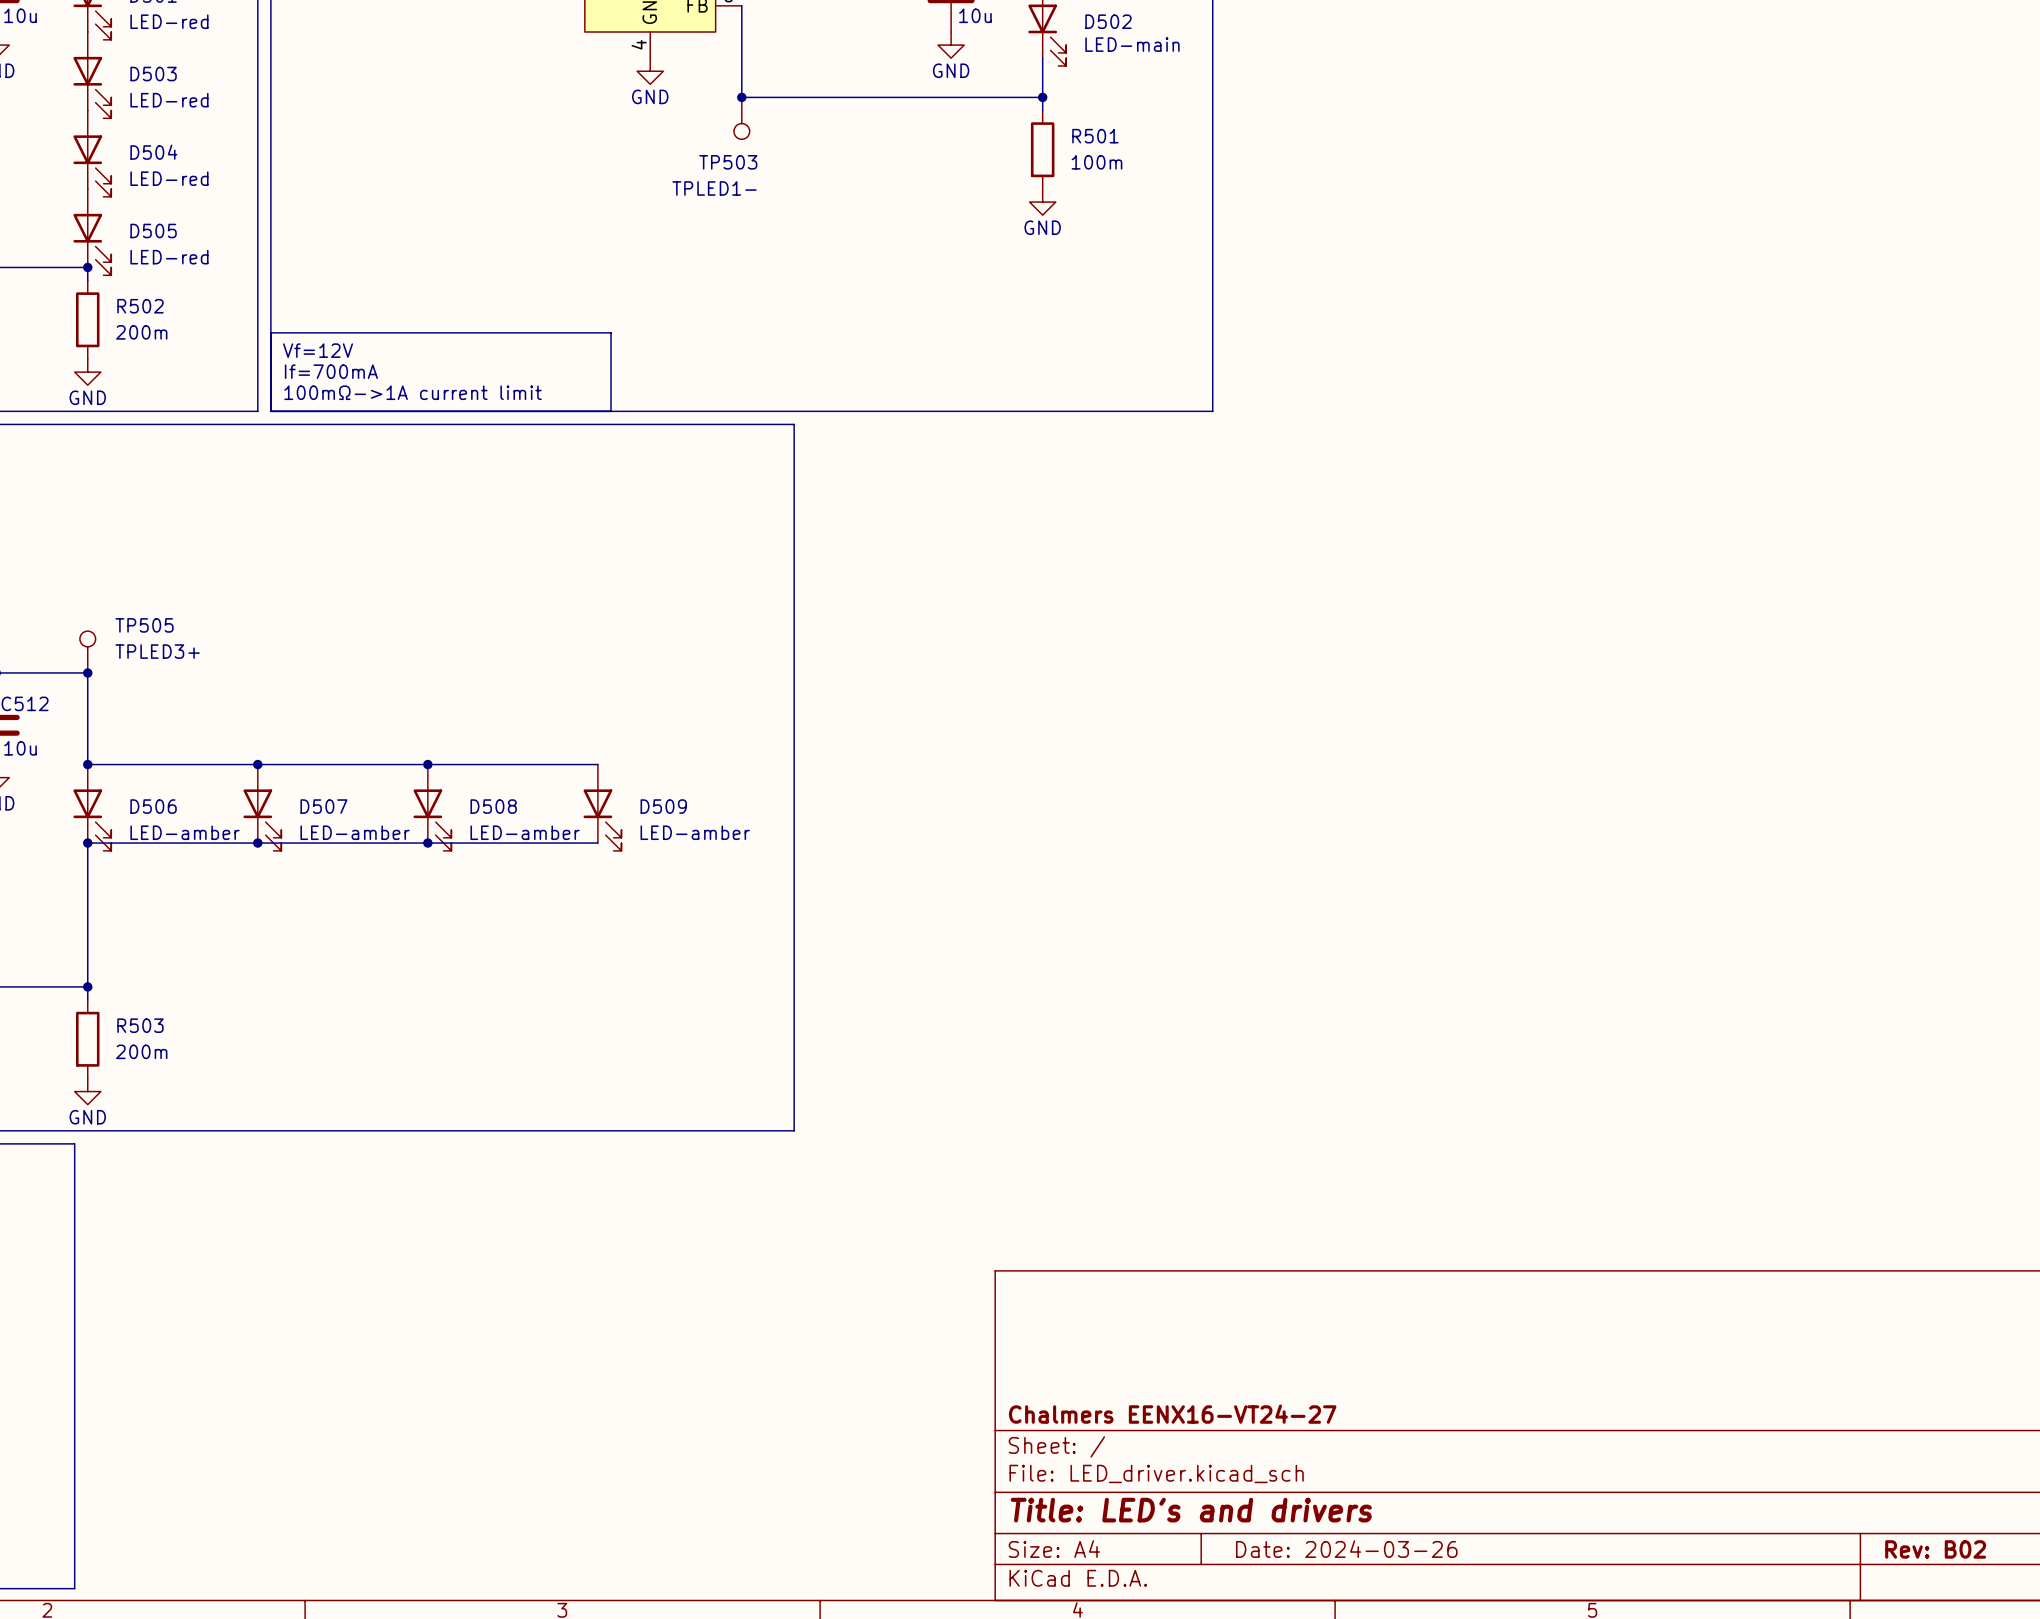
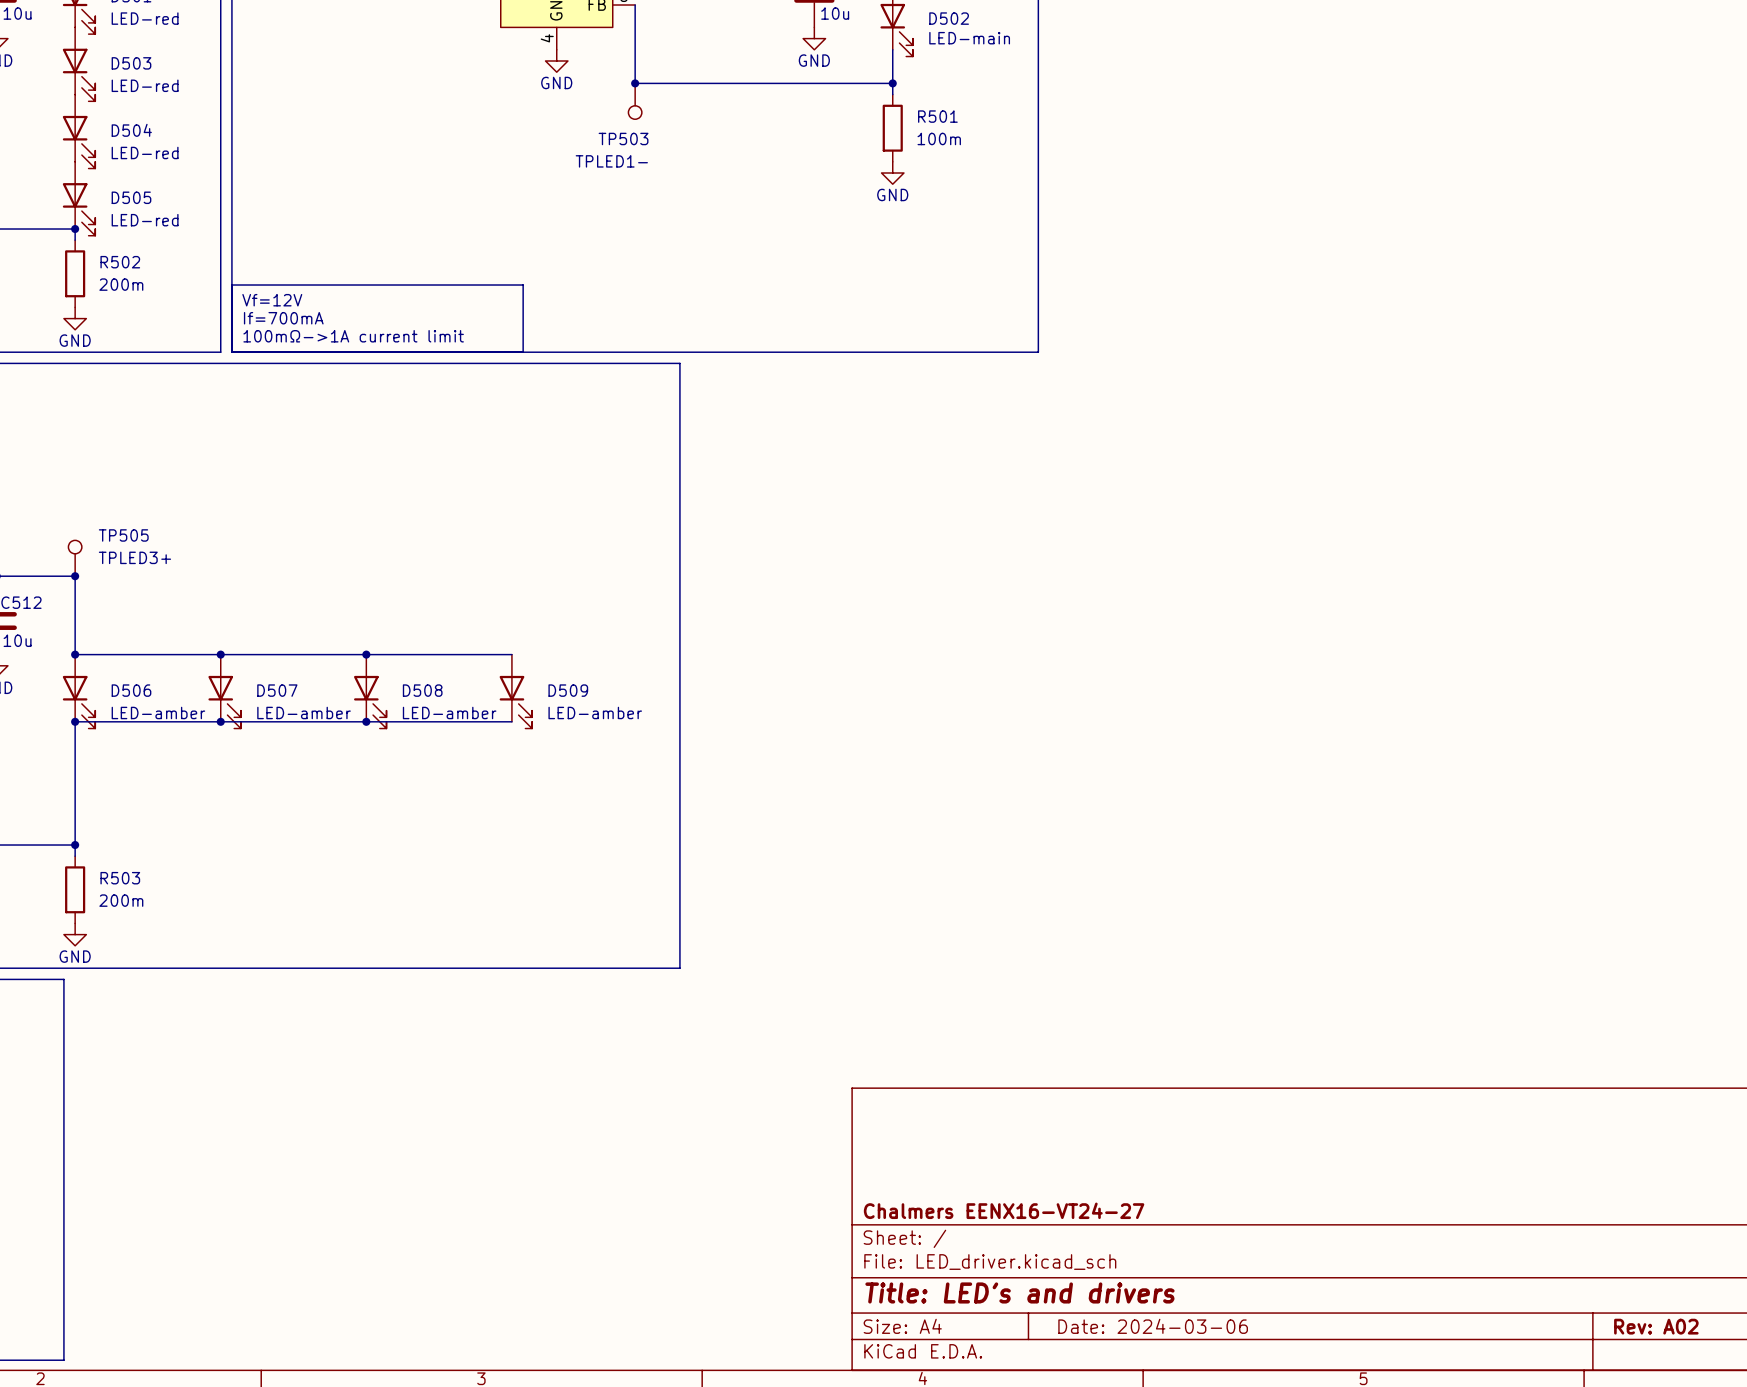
title block: Date: 2024-03-26 (1346, 1549) -> Date: 2024-03-06 (1153, 1326)
title block: Rev: B02 (1935, 1549) -> Rev: A02 (1656, 1326)

